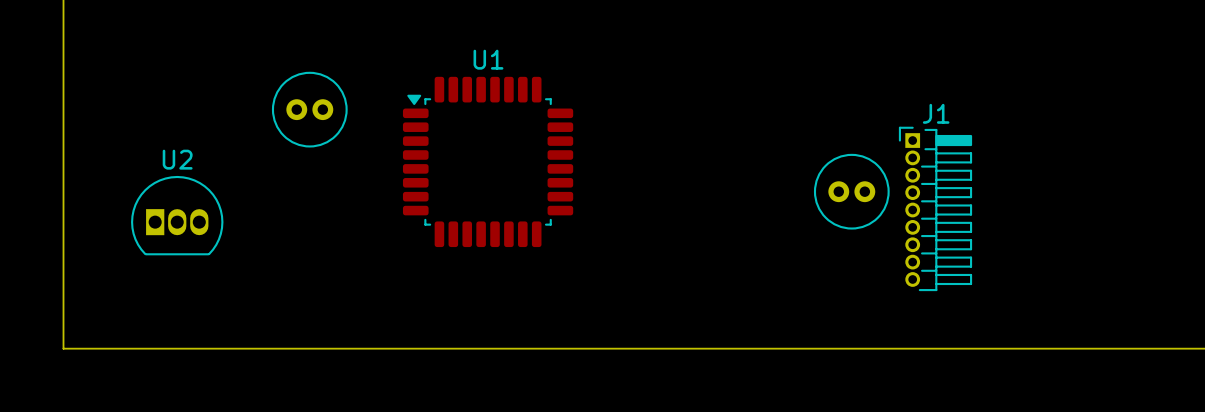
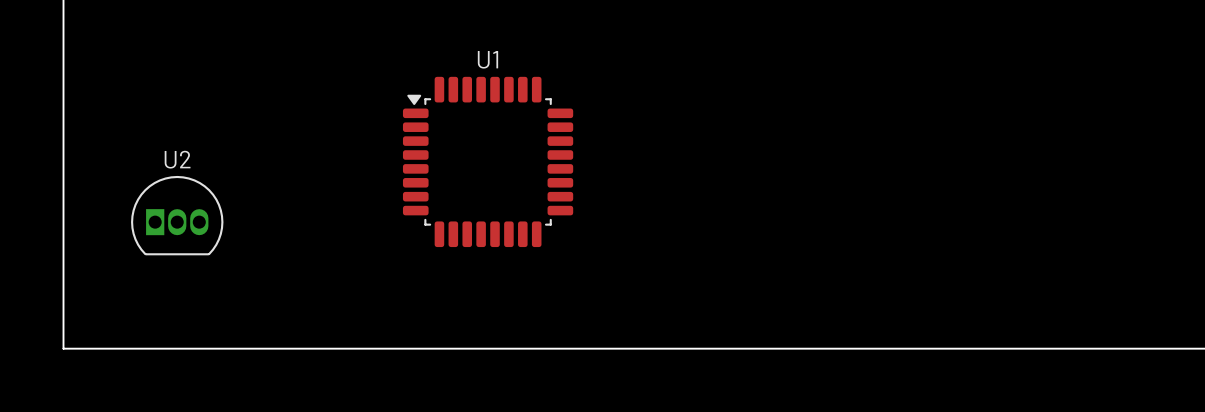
part: (309, 109) -> none
part: (851, 191) -> none
J1: (935, 208) -> none

